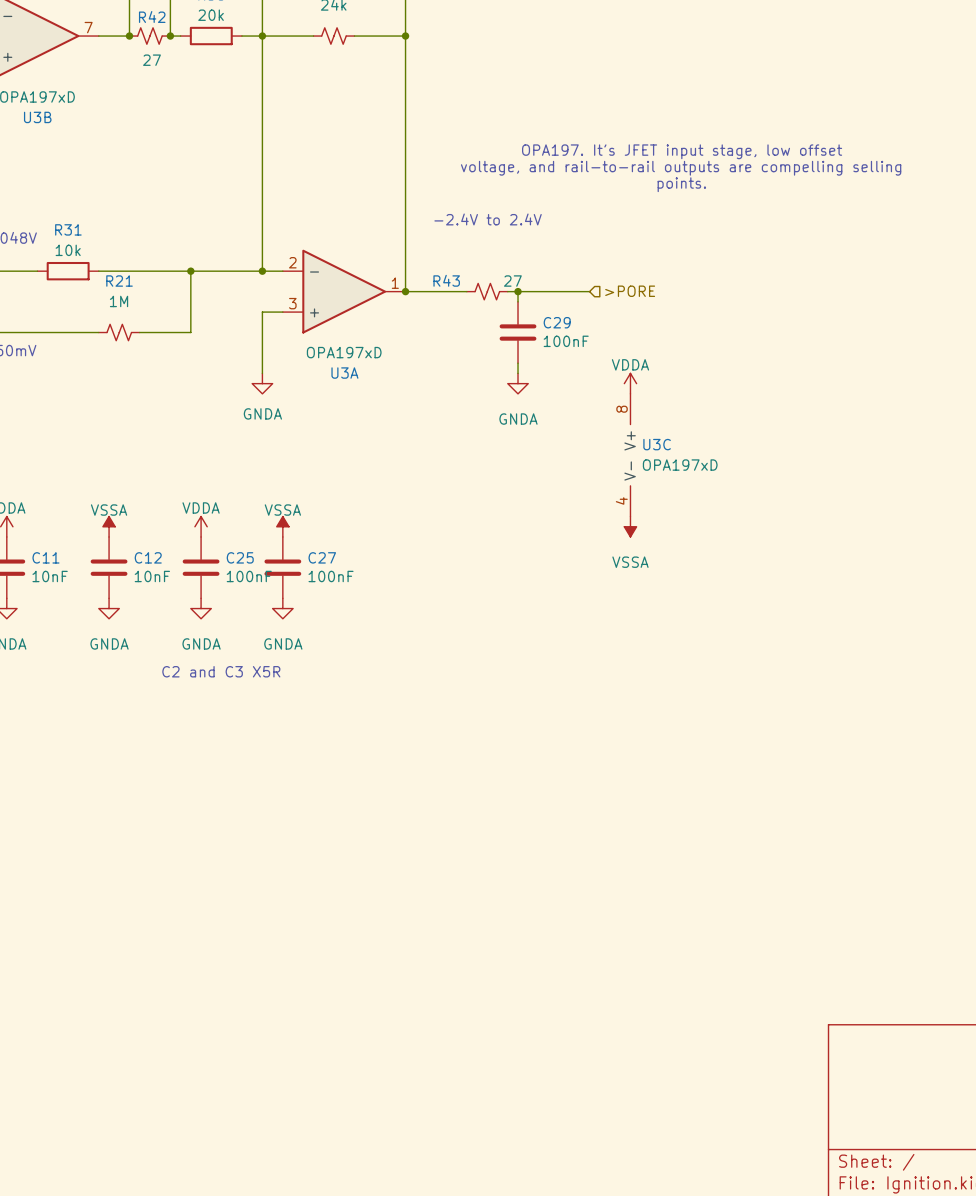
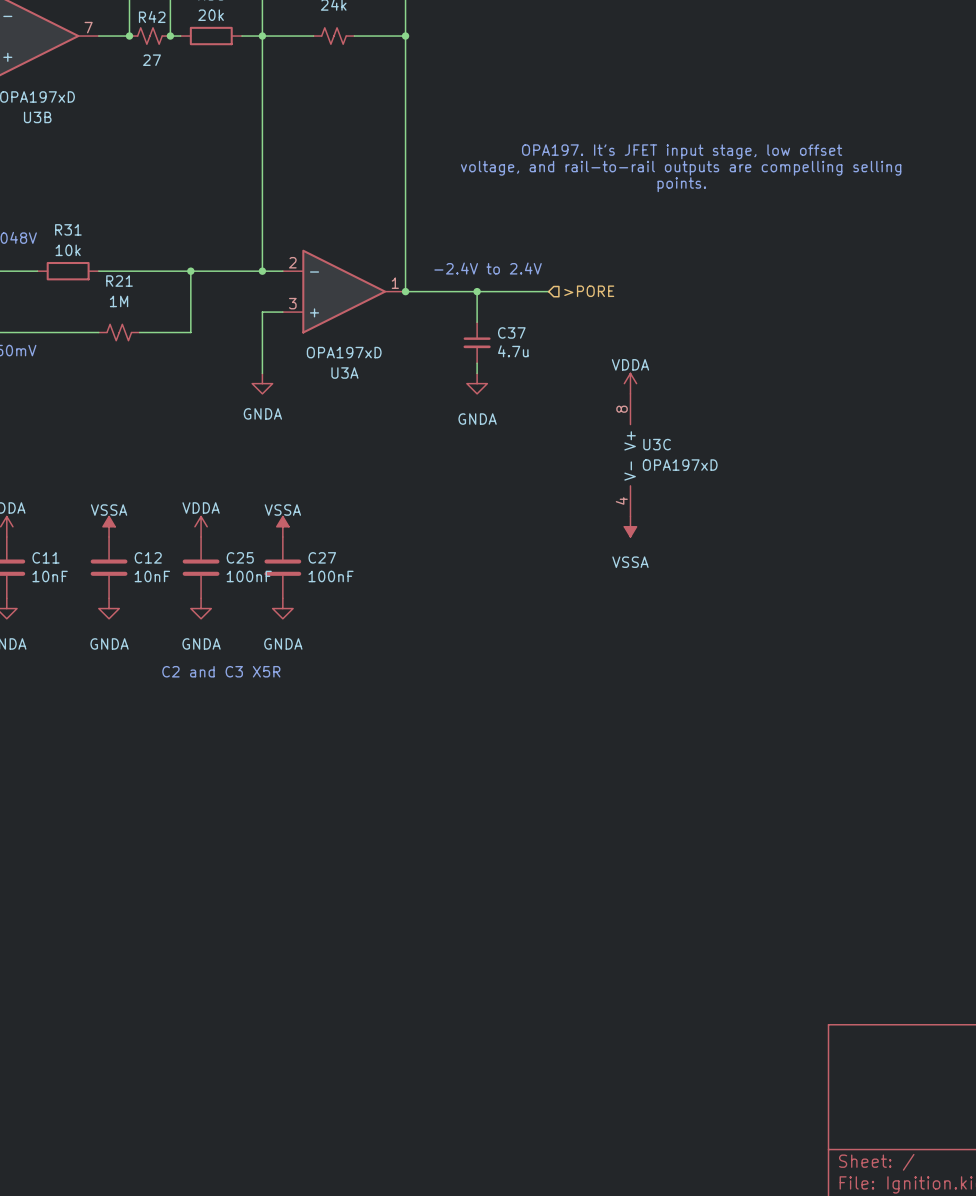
text position: -2.4V to 2.4V (488, 219) -> -2.4V to 2.4V (488, 268)
wire: none -> (477, 291) (477, 322)
R43: 27 (487, 291) -> none
wire: (518, 291) (518, 301) -> none
junction position: (518, 291) -> (477, 291)
hierarchical label position: >PORE (630, 291) -> >PORE (589, 291)
C29: 100nF (518, 332) -> none
C37: none -> 4.7u (477, 342)
wire: (518, 363) (518, 373) -> (477, 363) (477, 373)
power symbol position: GNDA (518, 383) -> GNDA (477, 383)

